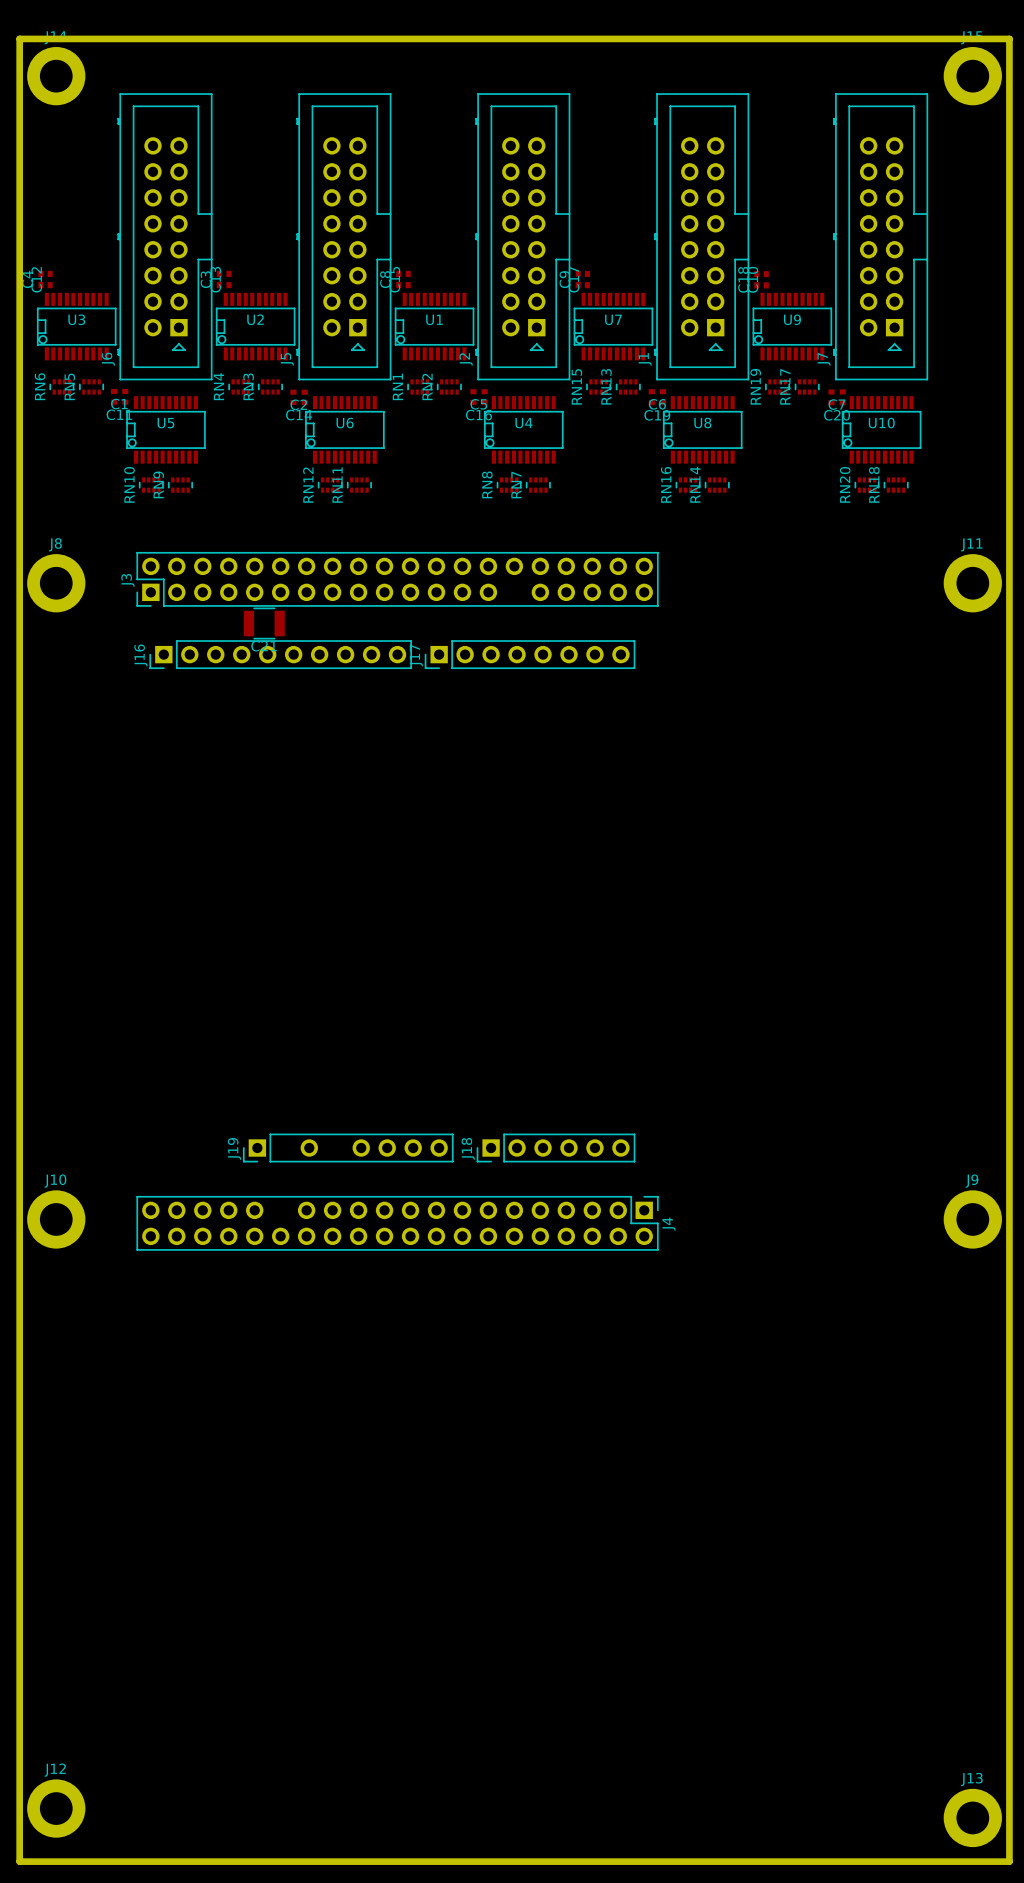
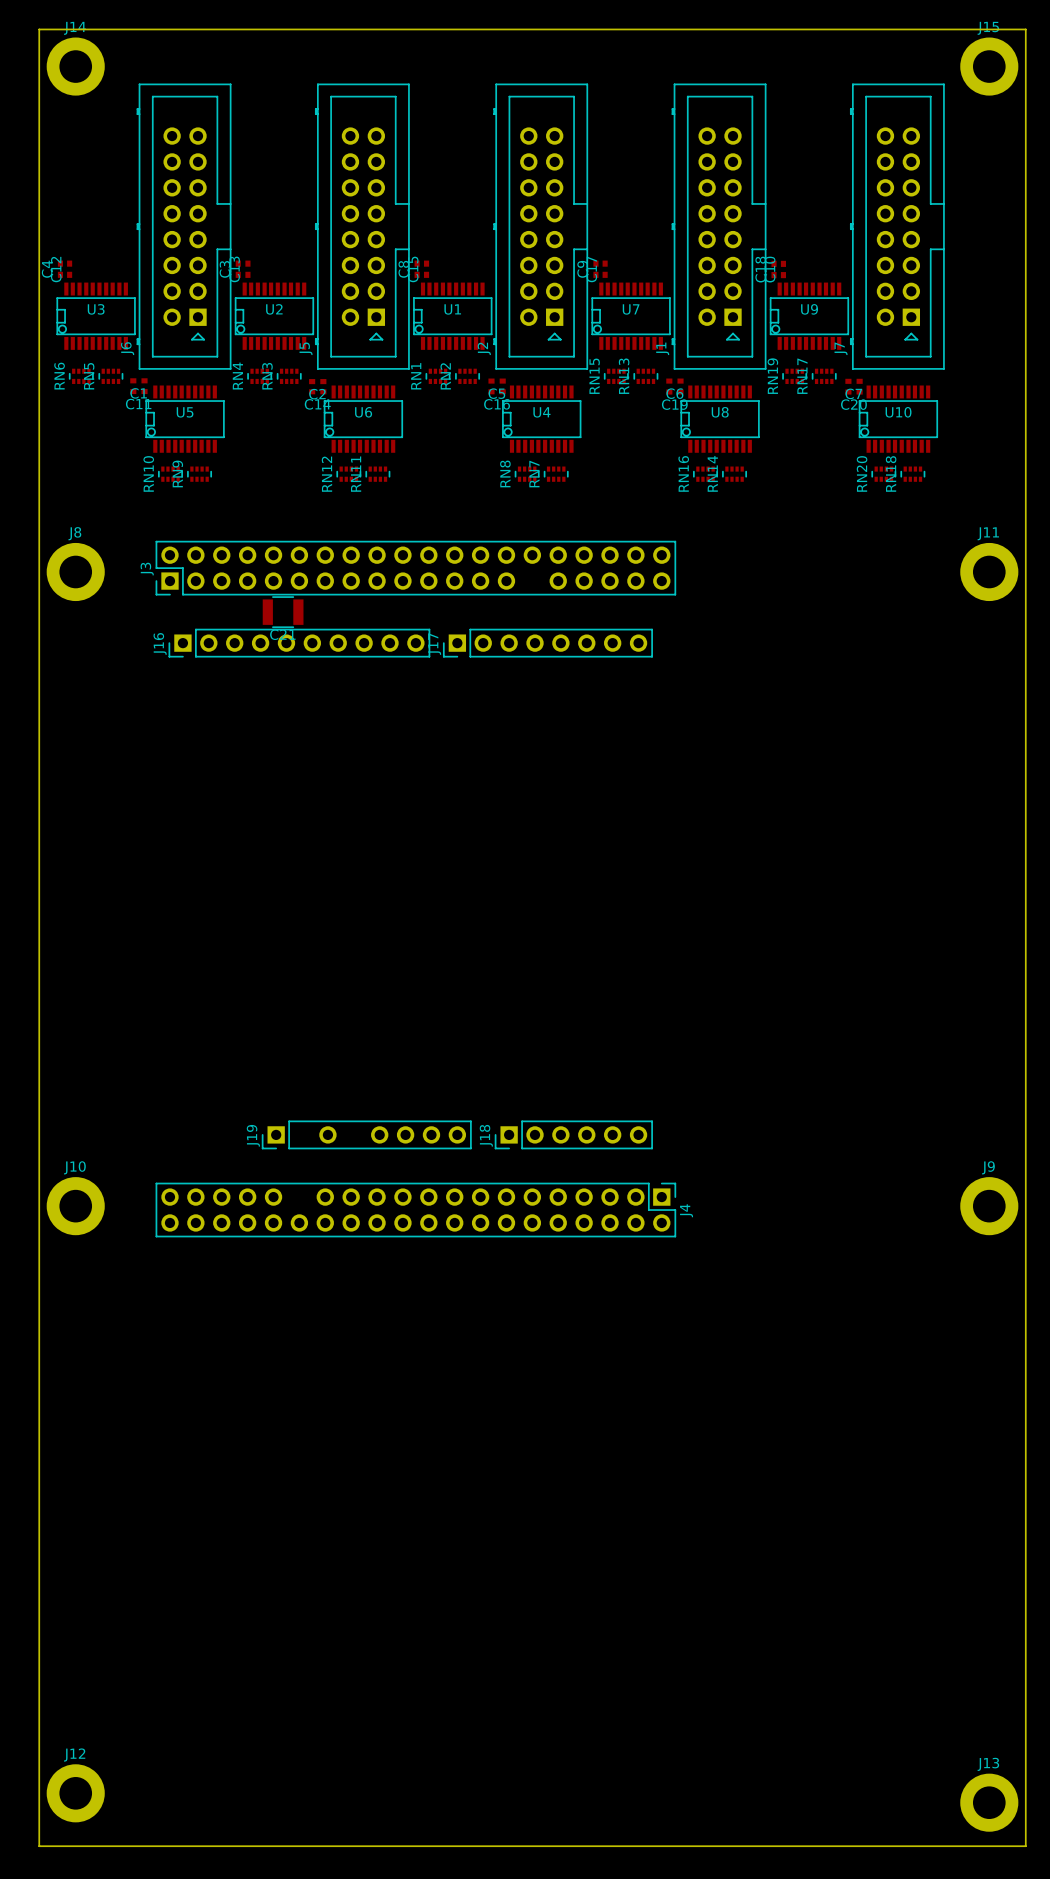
board edge width: thick (19, 38) (19, 1861) (1009, 1861) (1009, 38) (19, 38) -> thin (39, 29) (39, 1846) (1025, 1846) (1025, 29) (39, 29)

